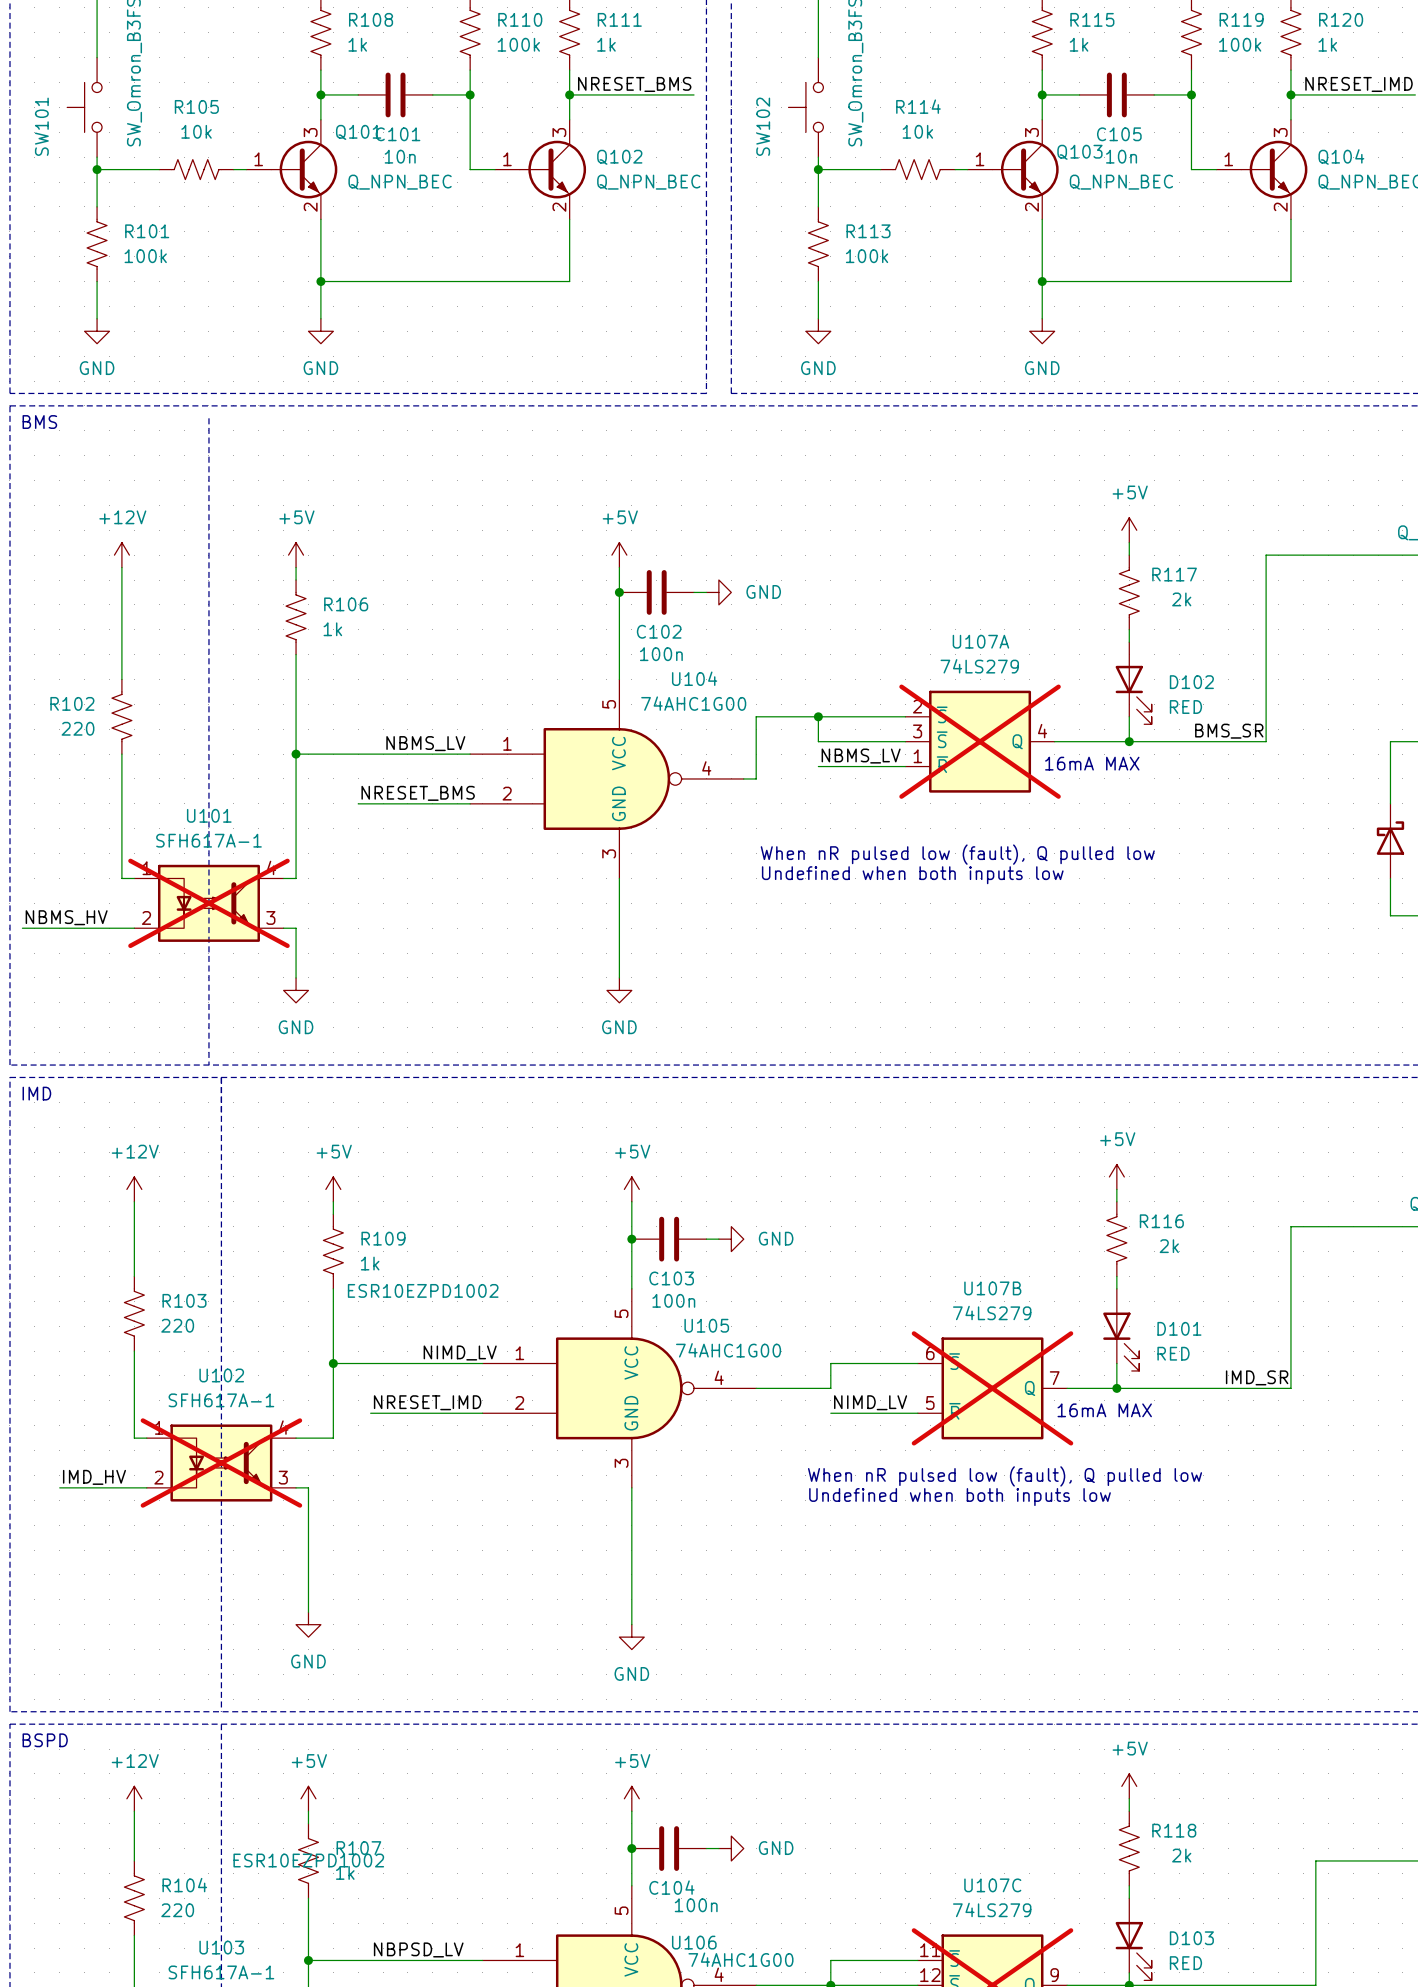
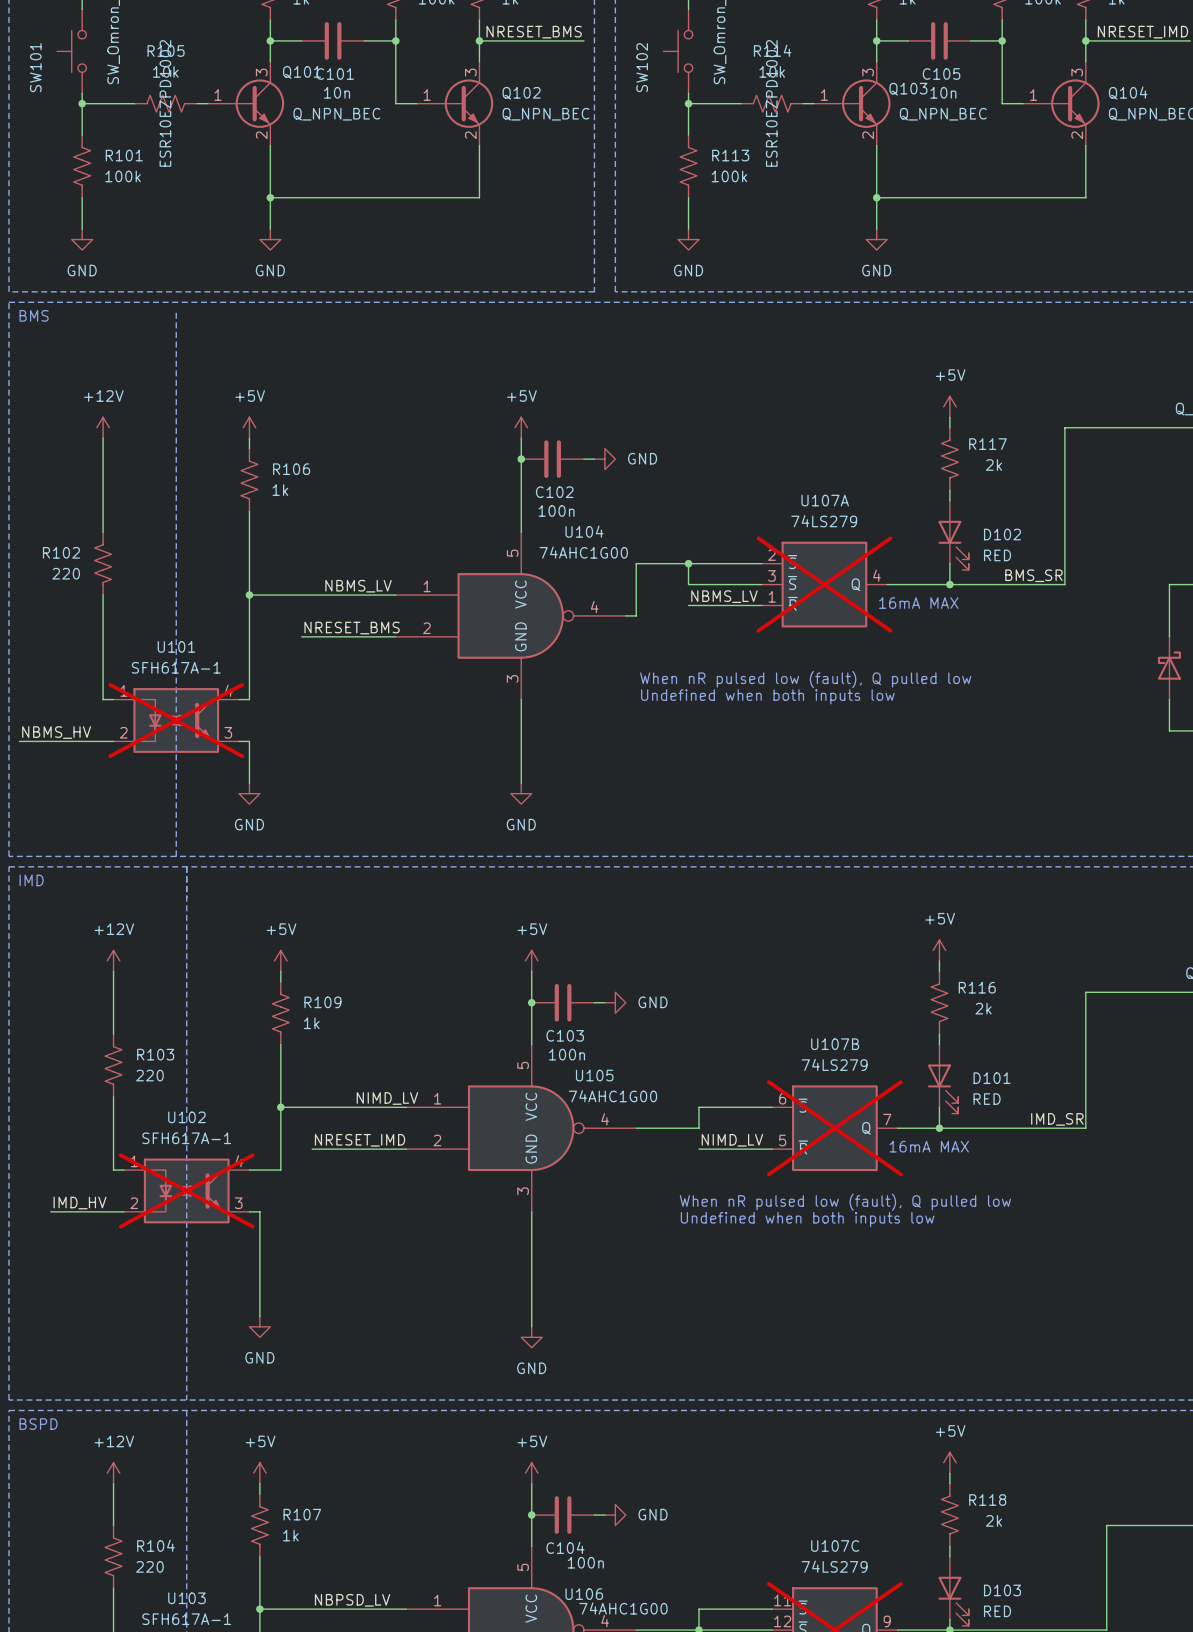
R105 text: none -> ESR10EZPD1002 (165, 103)
R114 text: none -> ESR10EZPD1002 (771, 103)
R109 text: ESR10EZPD1002 (423, 1290) -> none
R107 text: ESR10EZPD1002 (308, 1860) -> none

